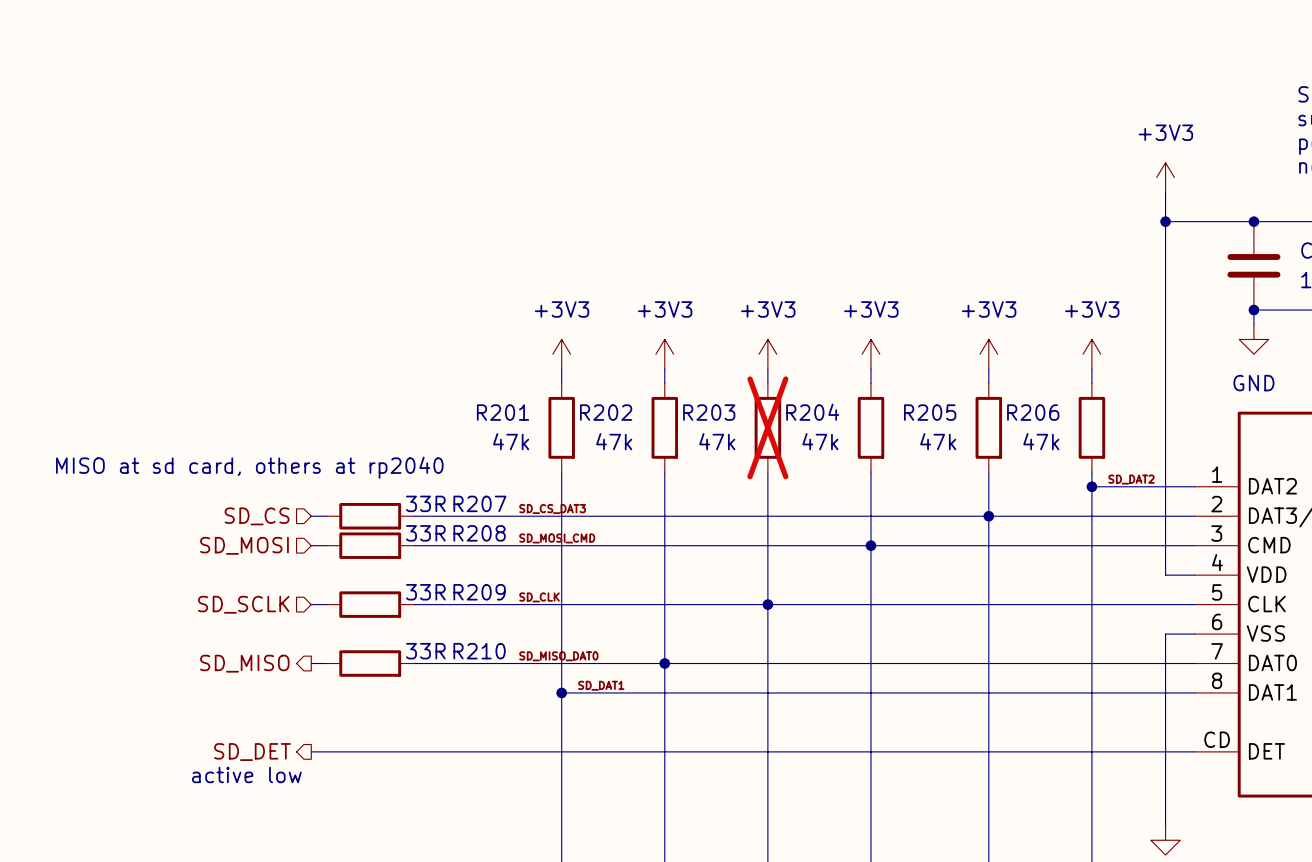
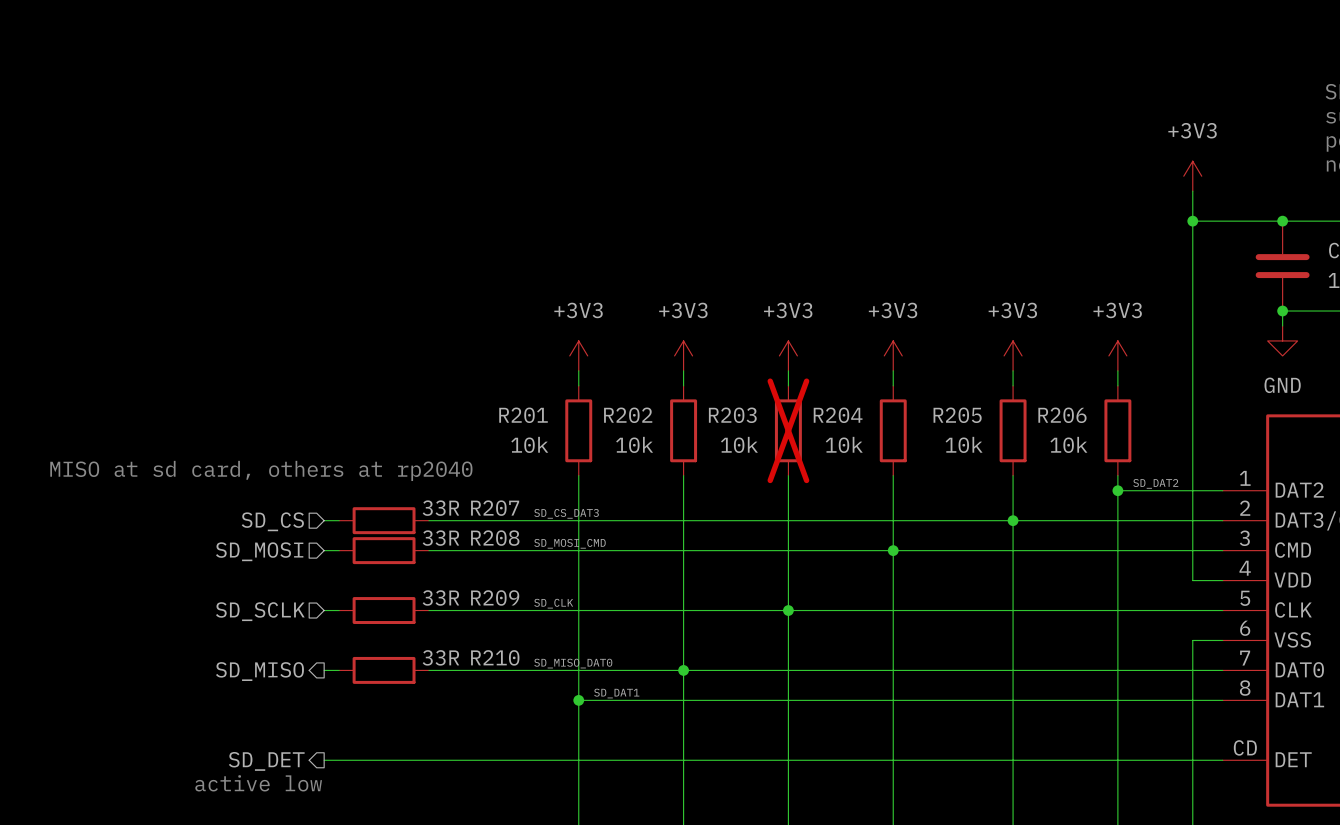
R201 value: 47k (511, 441) -> 10k (529, 444)
R202 value: 47k (614, 441) -> 10k (634, 444)
R203 value: 47k (717, 441) -> 10k (739, 444)
R204 value: 47k (820, 441) -> 10k (844, 444)
R205 value: 47k (938, 441) -> 10k (964, 444)
R206 value: 47k (1041, 441) -> 10k (1068, 444)

